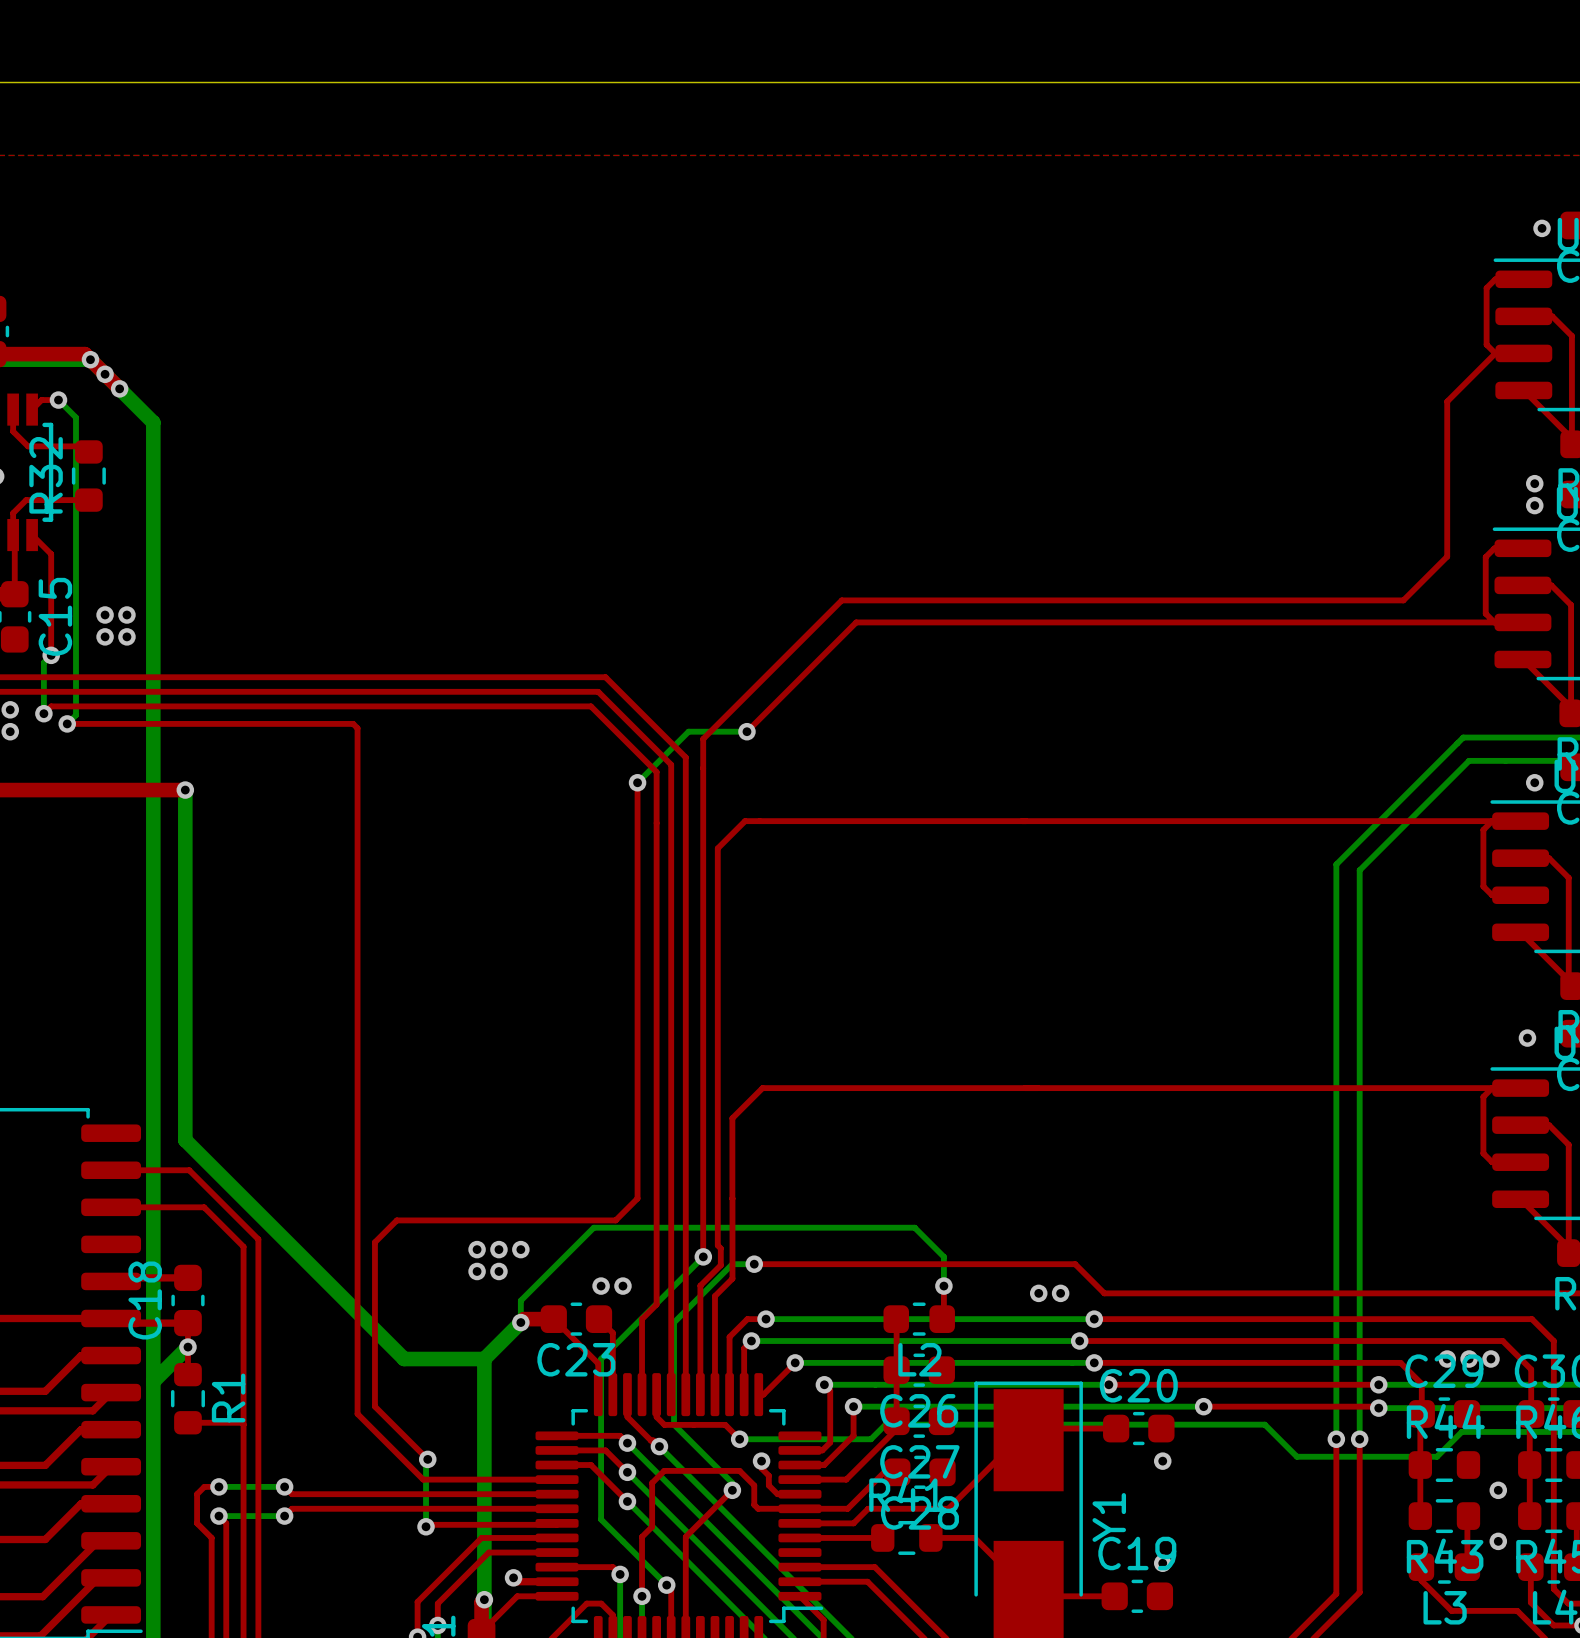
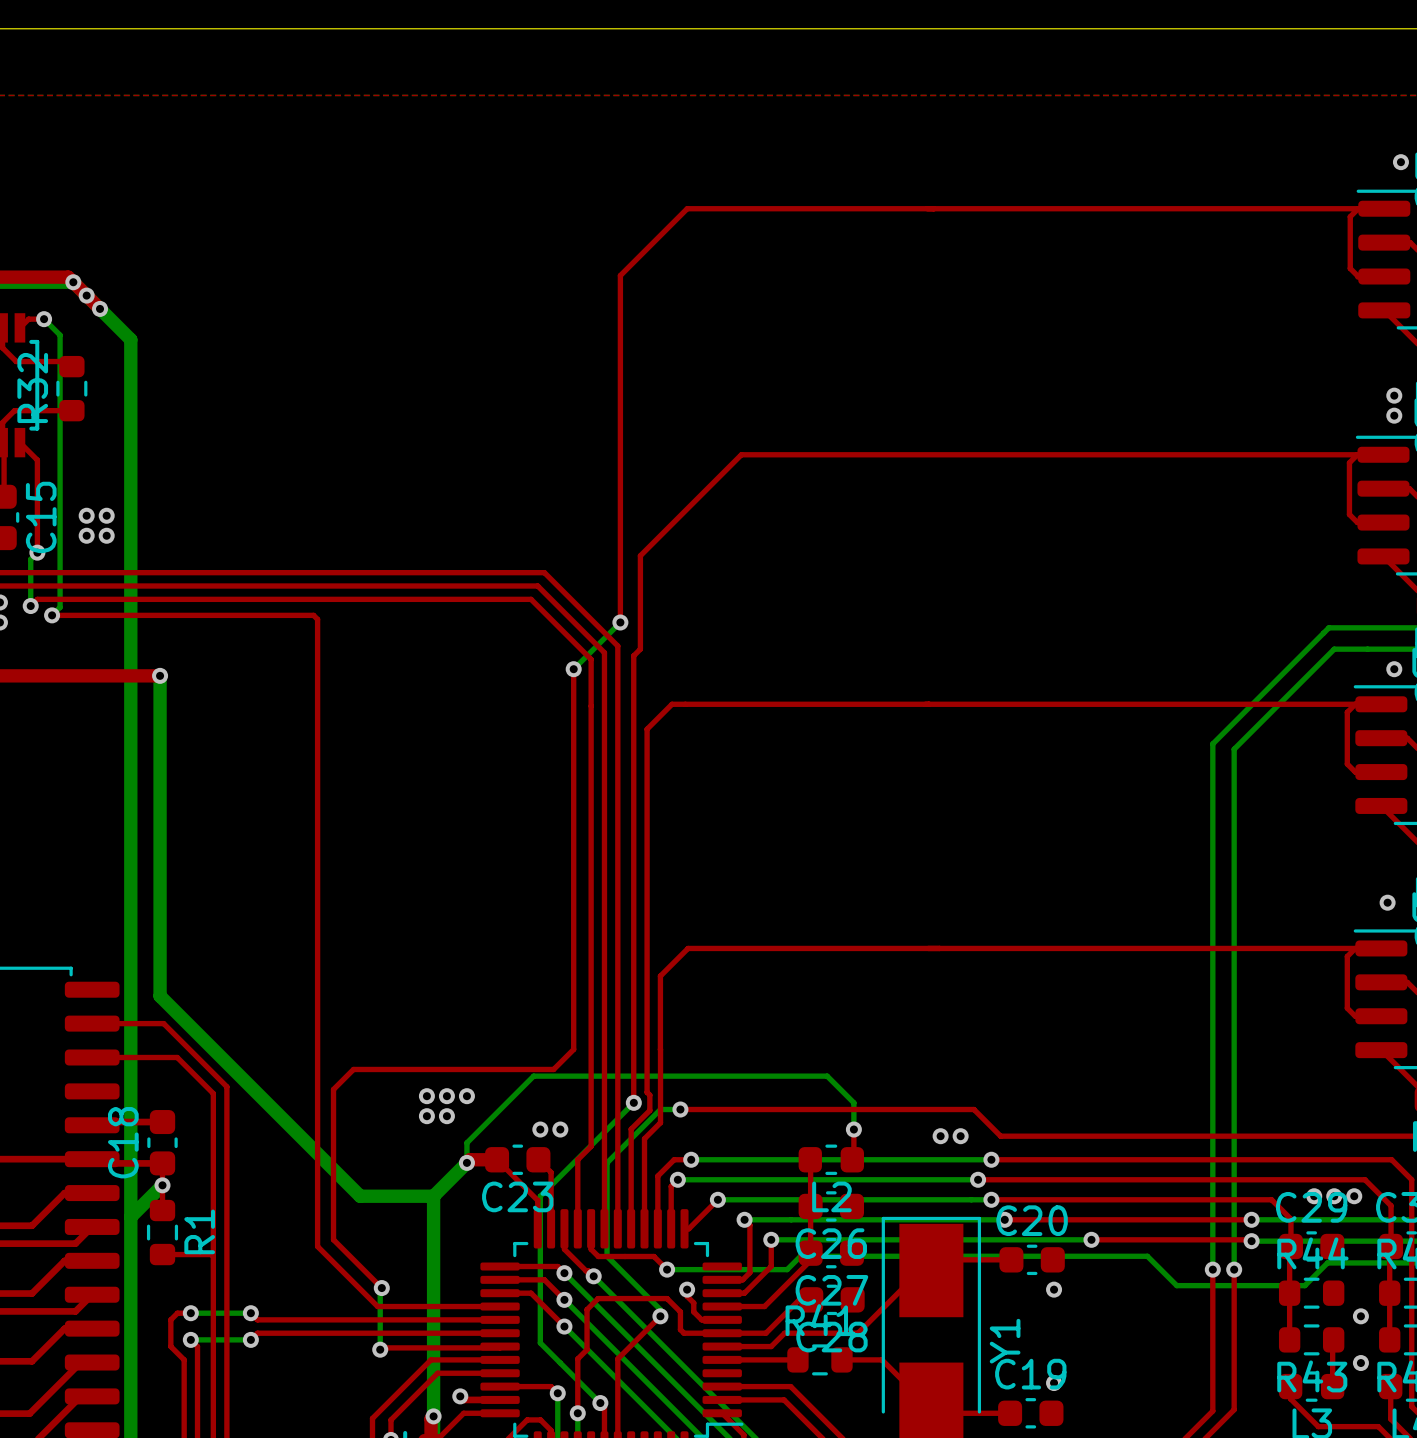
top track: none -> (1358, 208) (687, 208) (620, 275) (620, 622)
top track: (1495, 353) (1447, 401) (1447, 556) (1403, 600) (841, 600) (703, 739) (703, 768) -> (1357, 454) (741, 454) (640, 555) (640, 649) (633, 655)
top track: (1494, 622) (856, 622) (746, 731) -> none
bottom track: (688, 731) (746, 731) -> none
via position: (746, 731) -> (620, 622)

